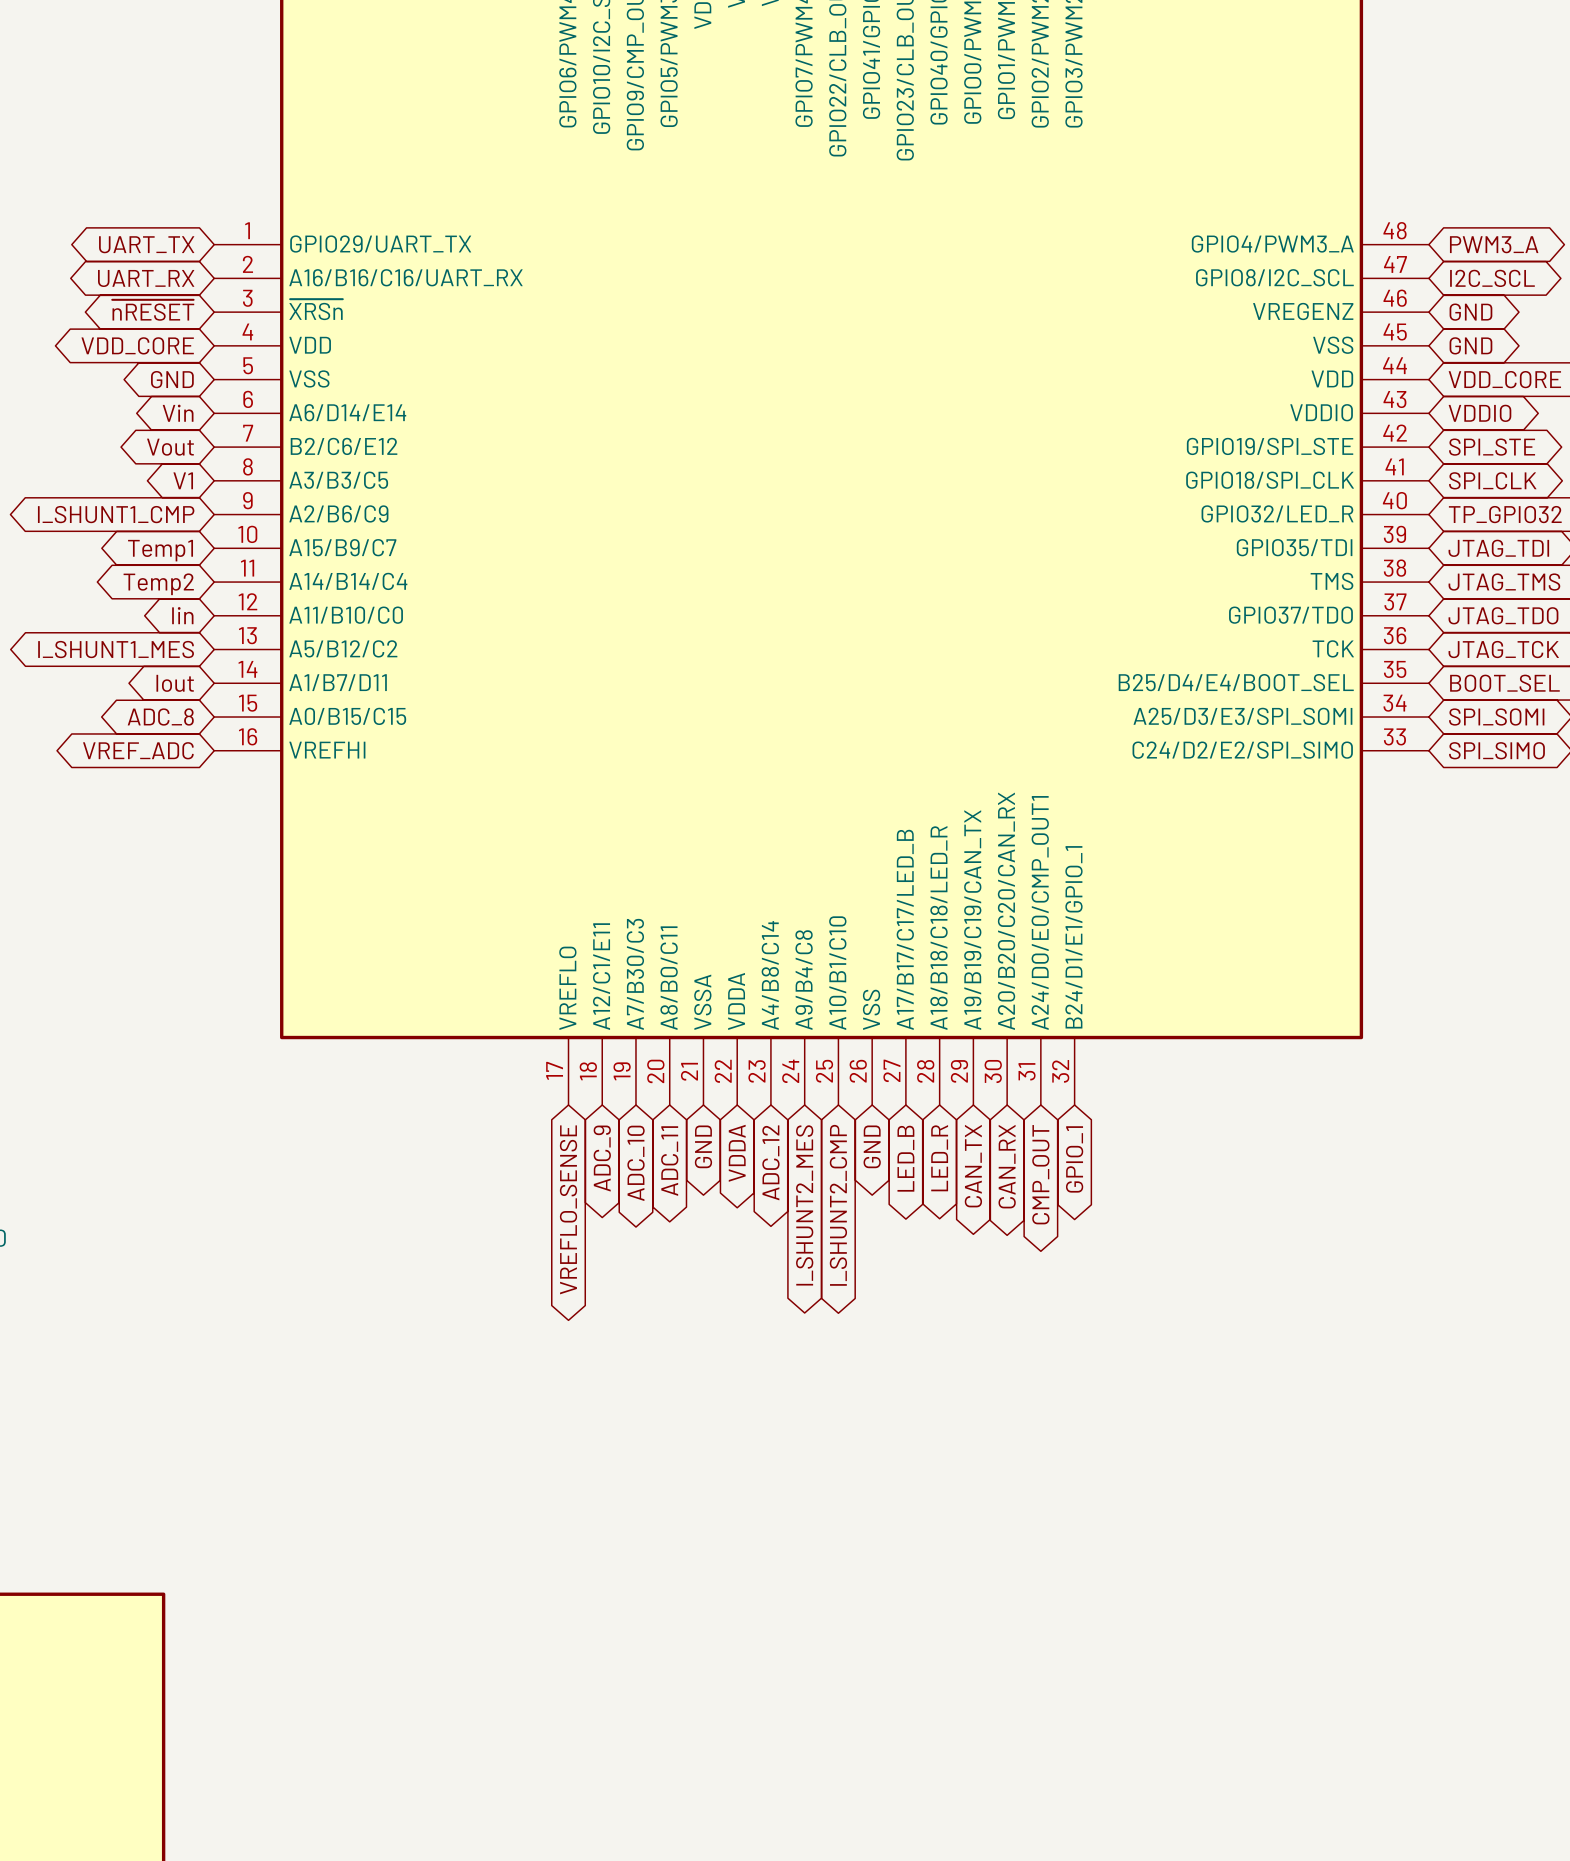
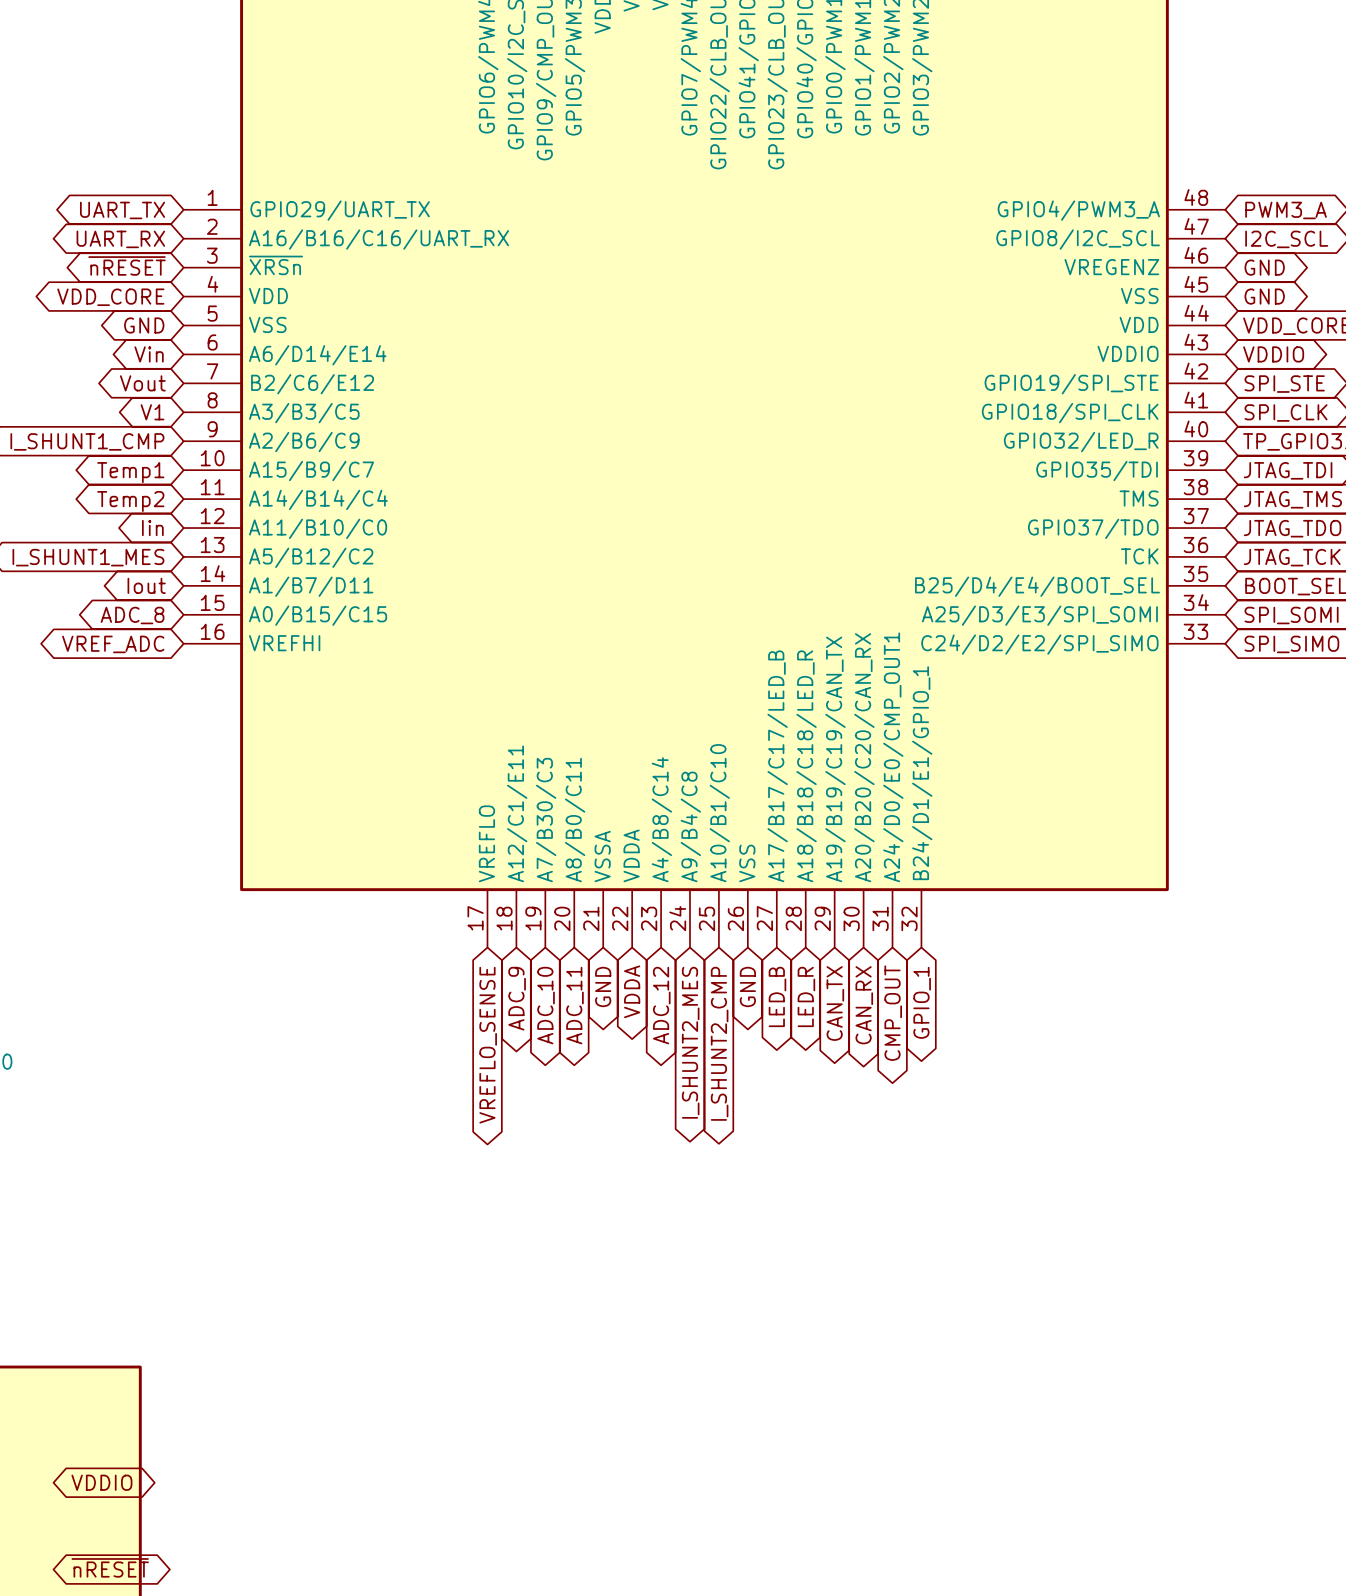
global label: none -> VDDIO (101, 1482)
global label: none -> ~{nRESET} (110, 1567)

